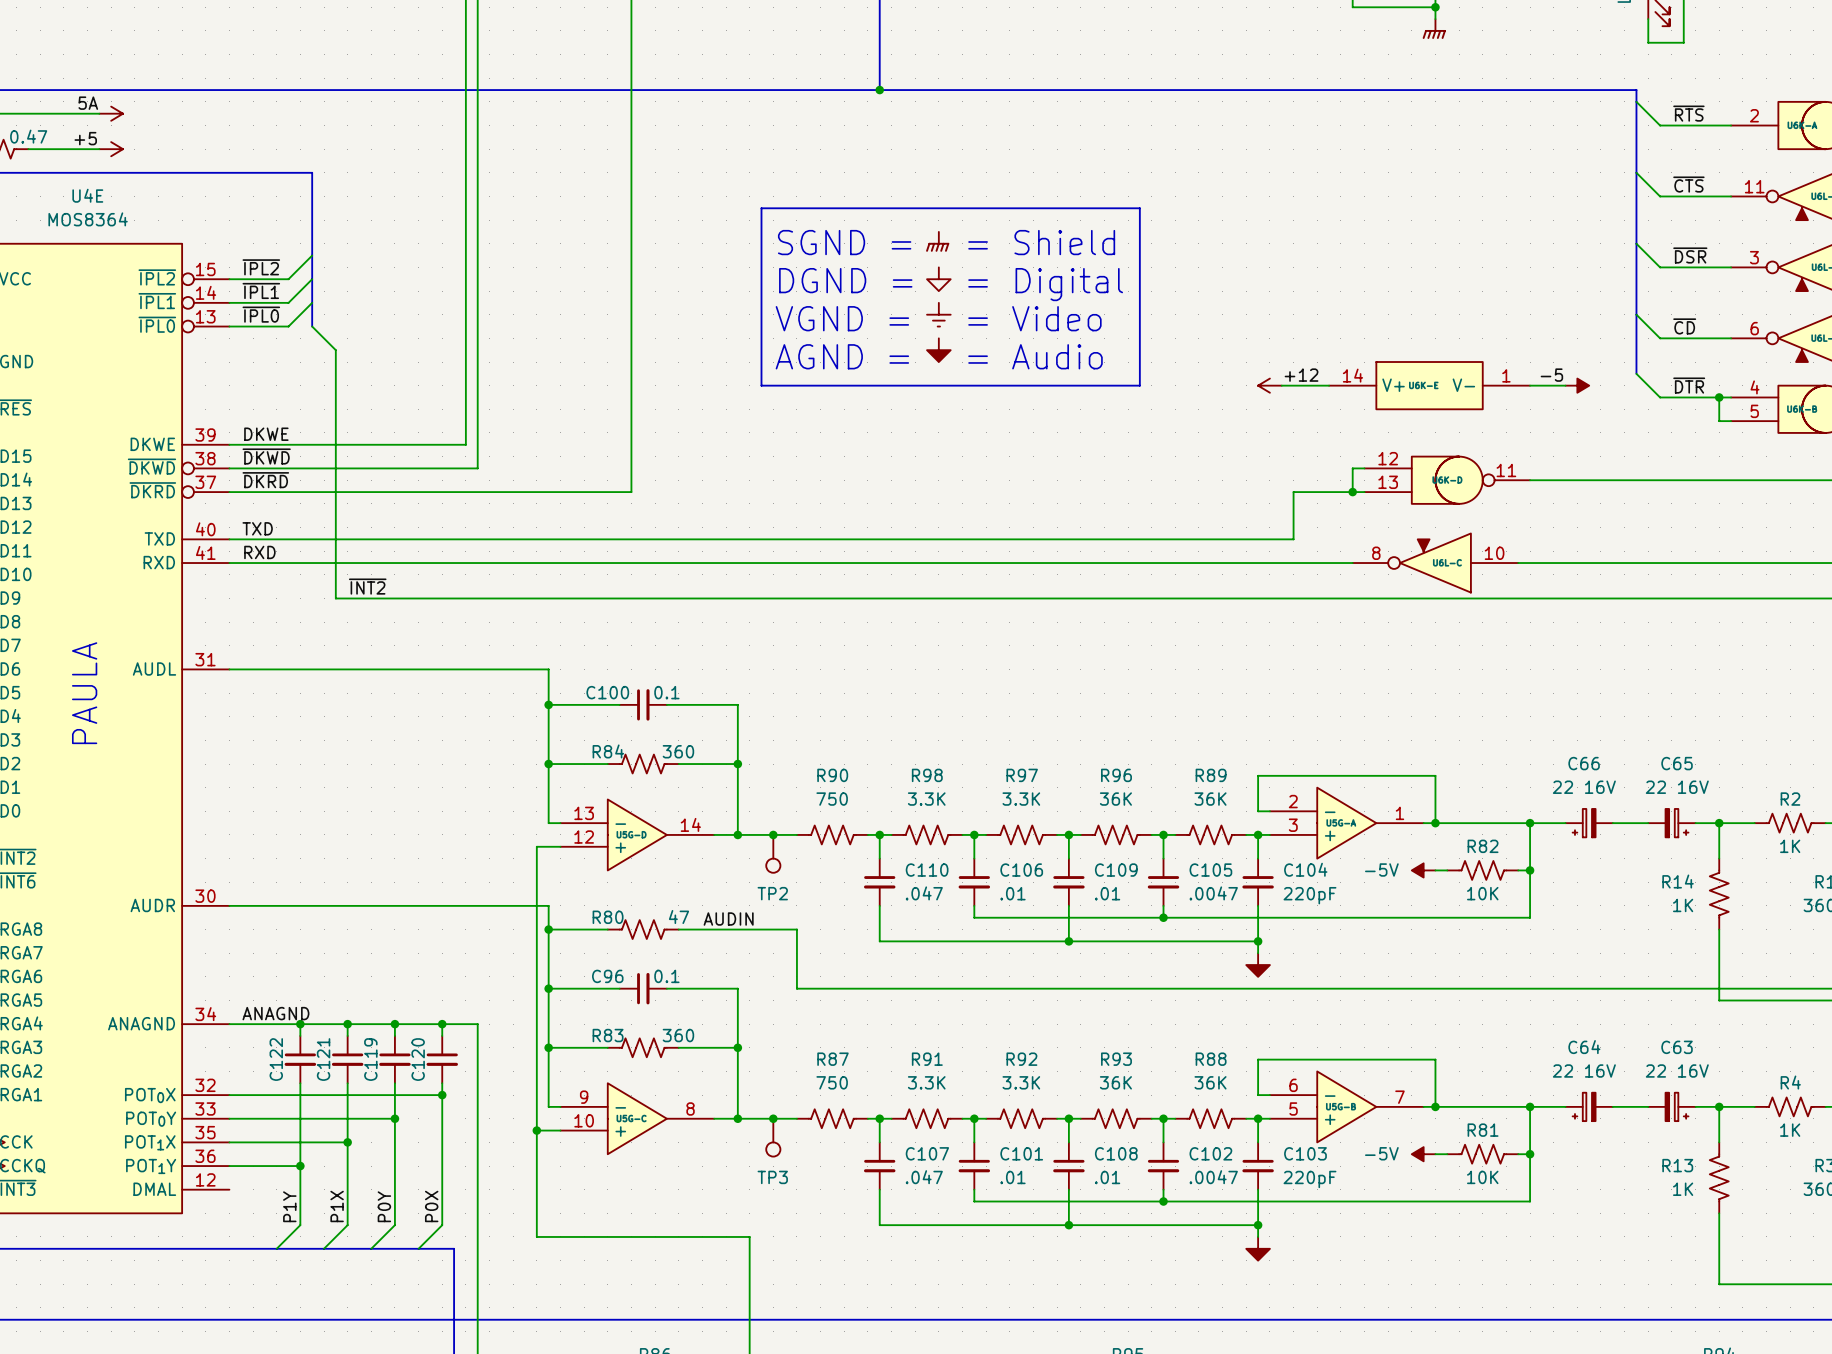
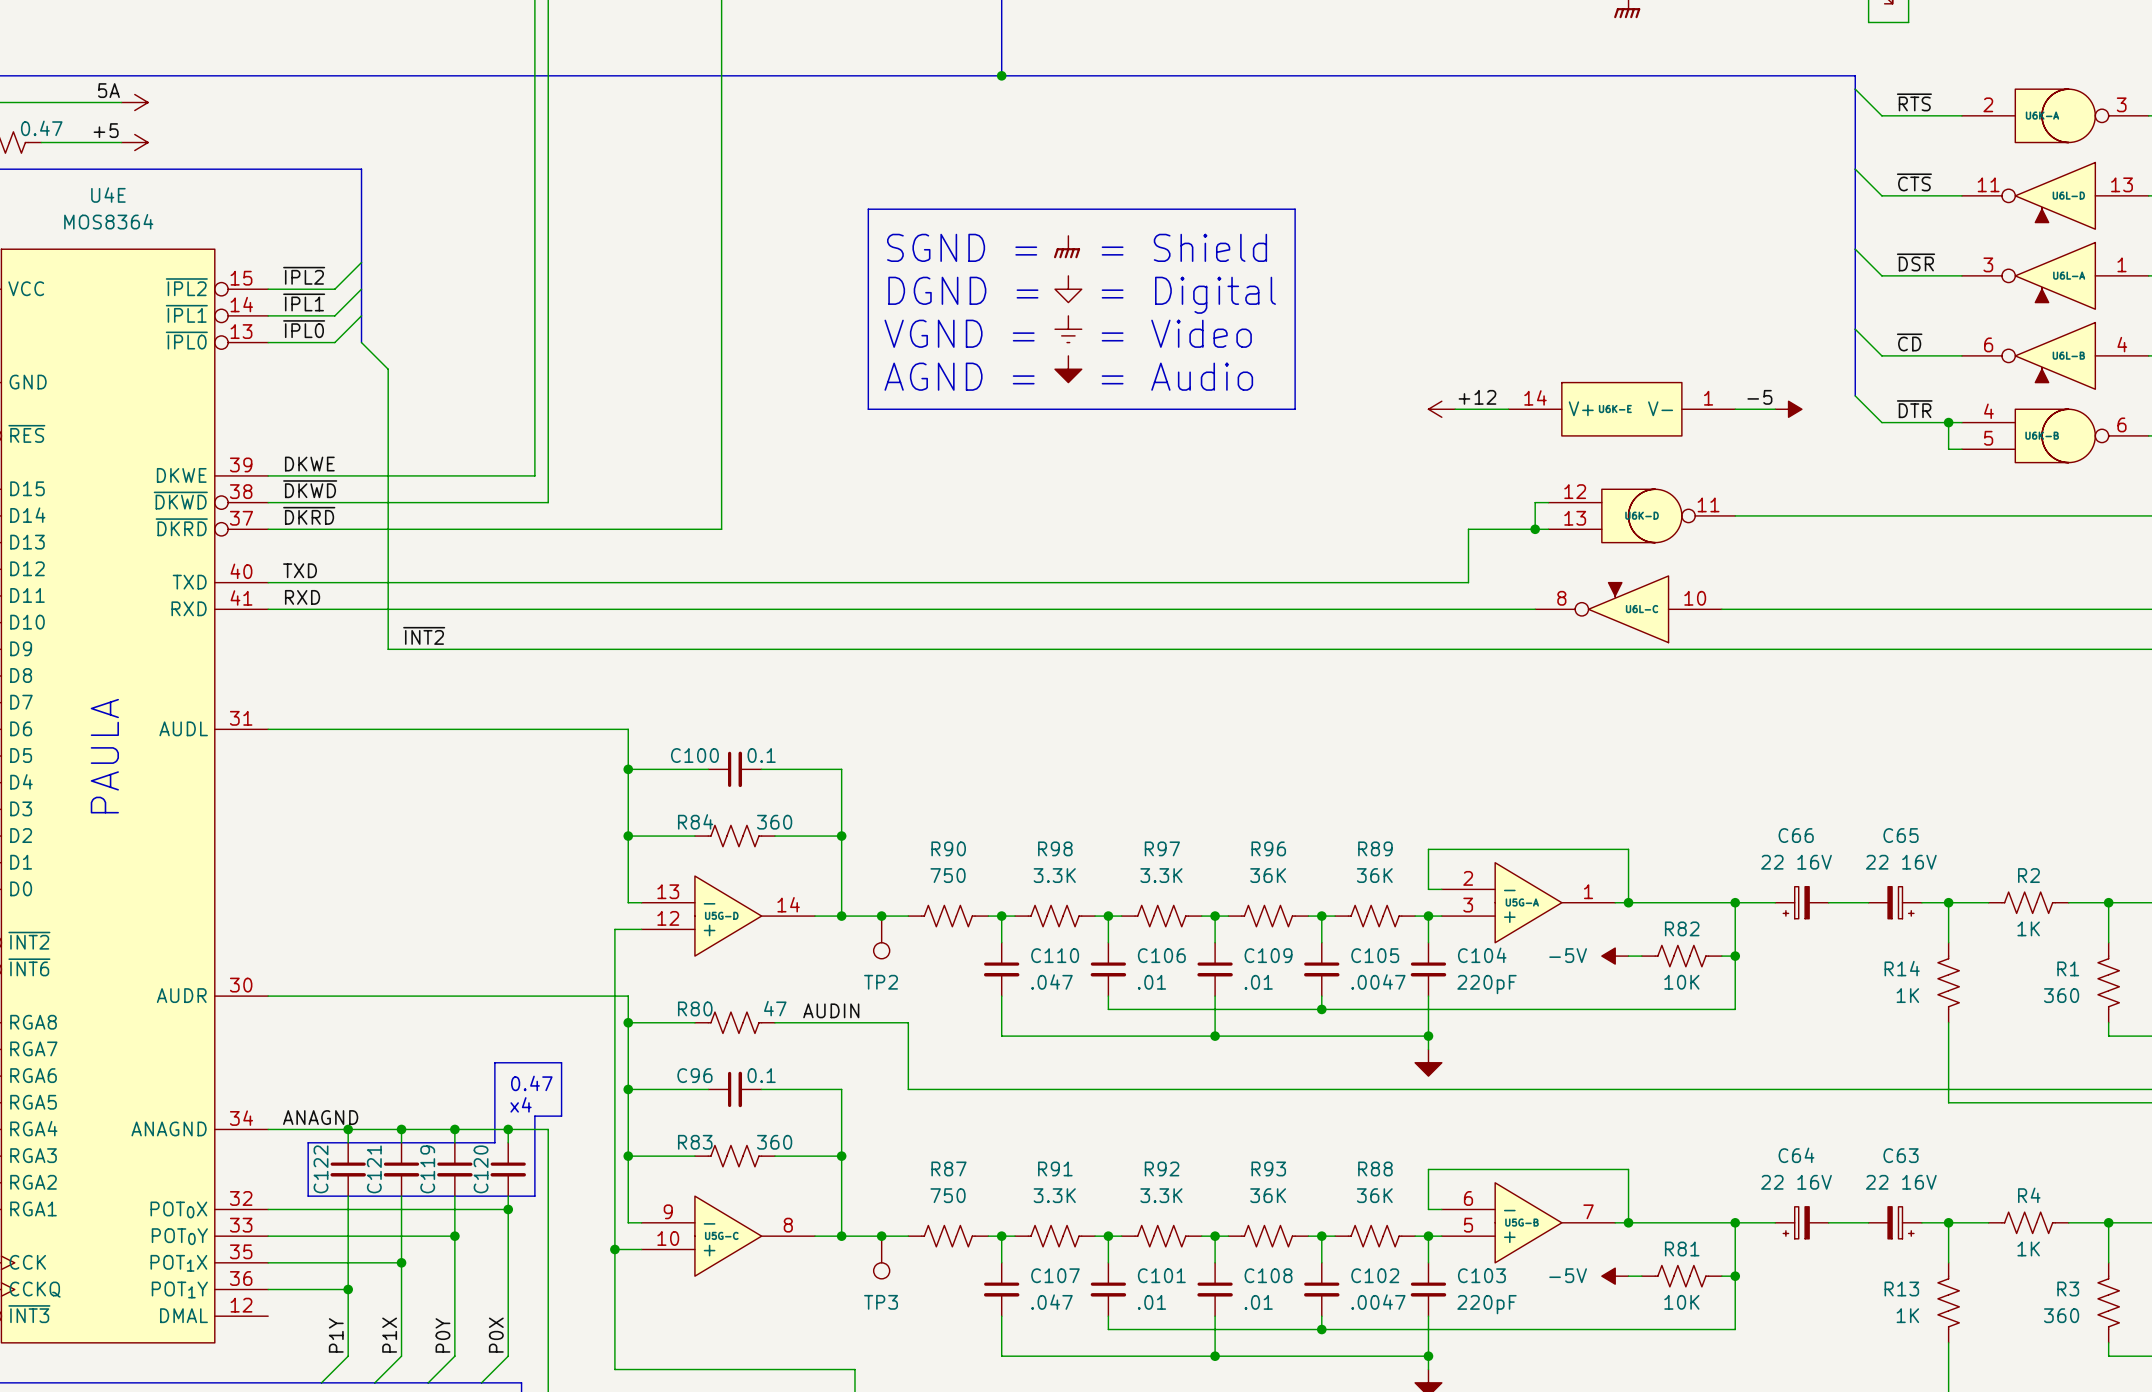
line: none -> (494, 1062) (561, 1062) (561, 1116) (534, 1116) (534, 1196) (308, 1196) (308, 1142) (494, 1142) (494, 1062)
text: none -> 0.47 (531, 1083)
text: none -> x4 (521, 1104)

